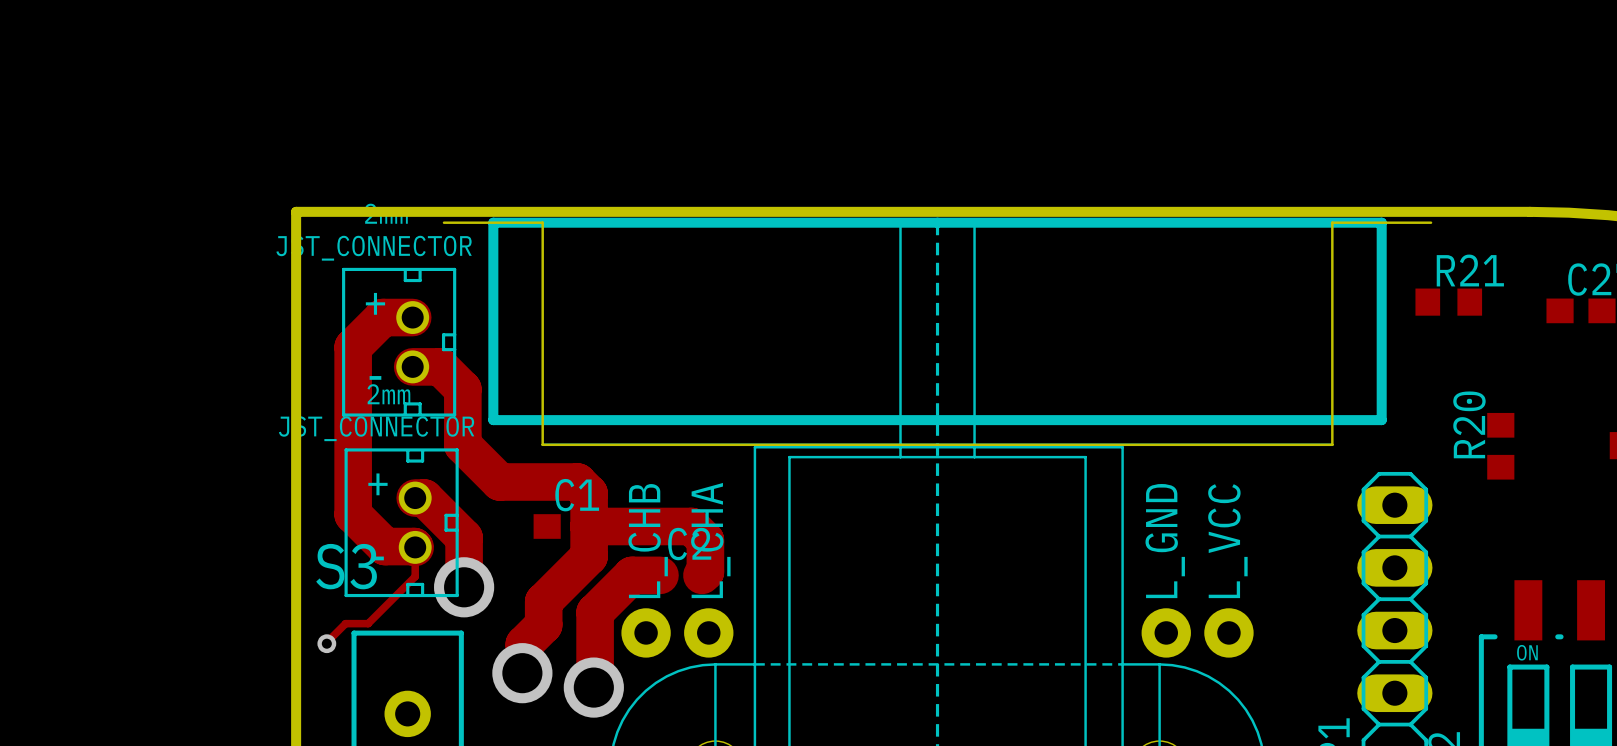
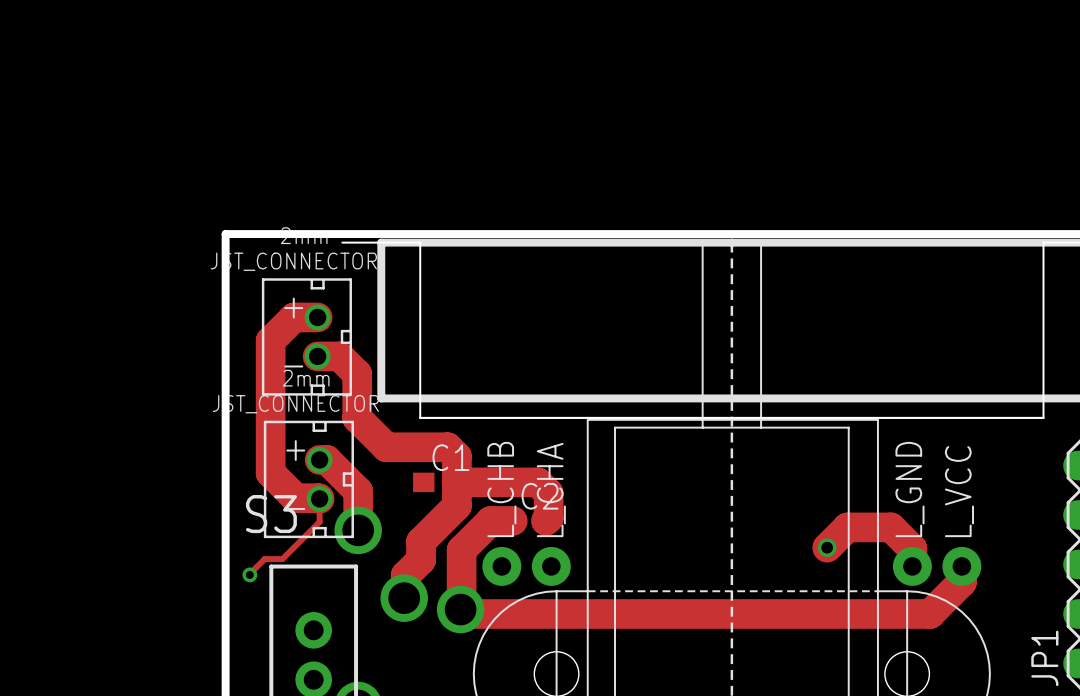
track: none -> (827, 547) (847, 527) (891, 527) (912, 548) (912, 566)
via: none -> (827, 547)
track: none -> (961, 566) (961, 582) (930, 613) (465, 613) (460, 609)

